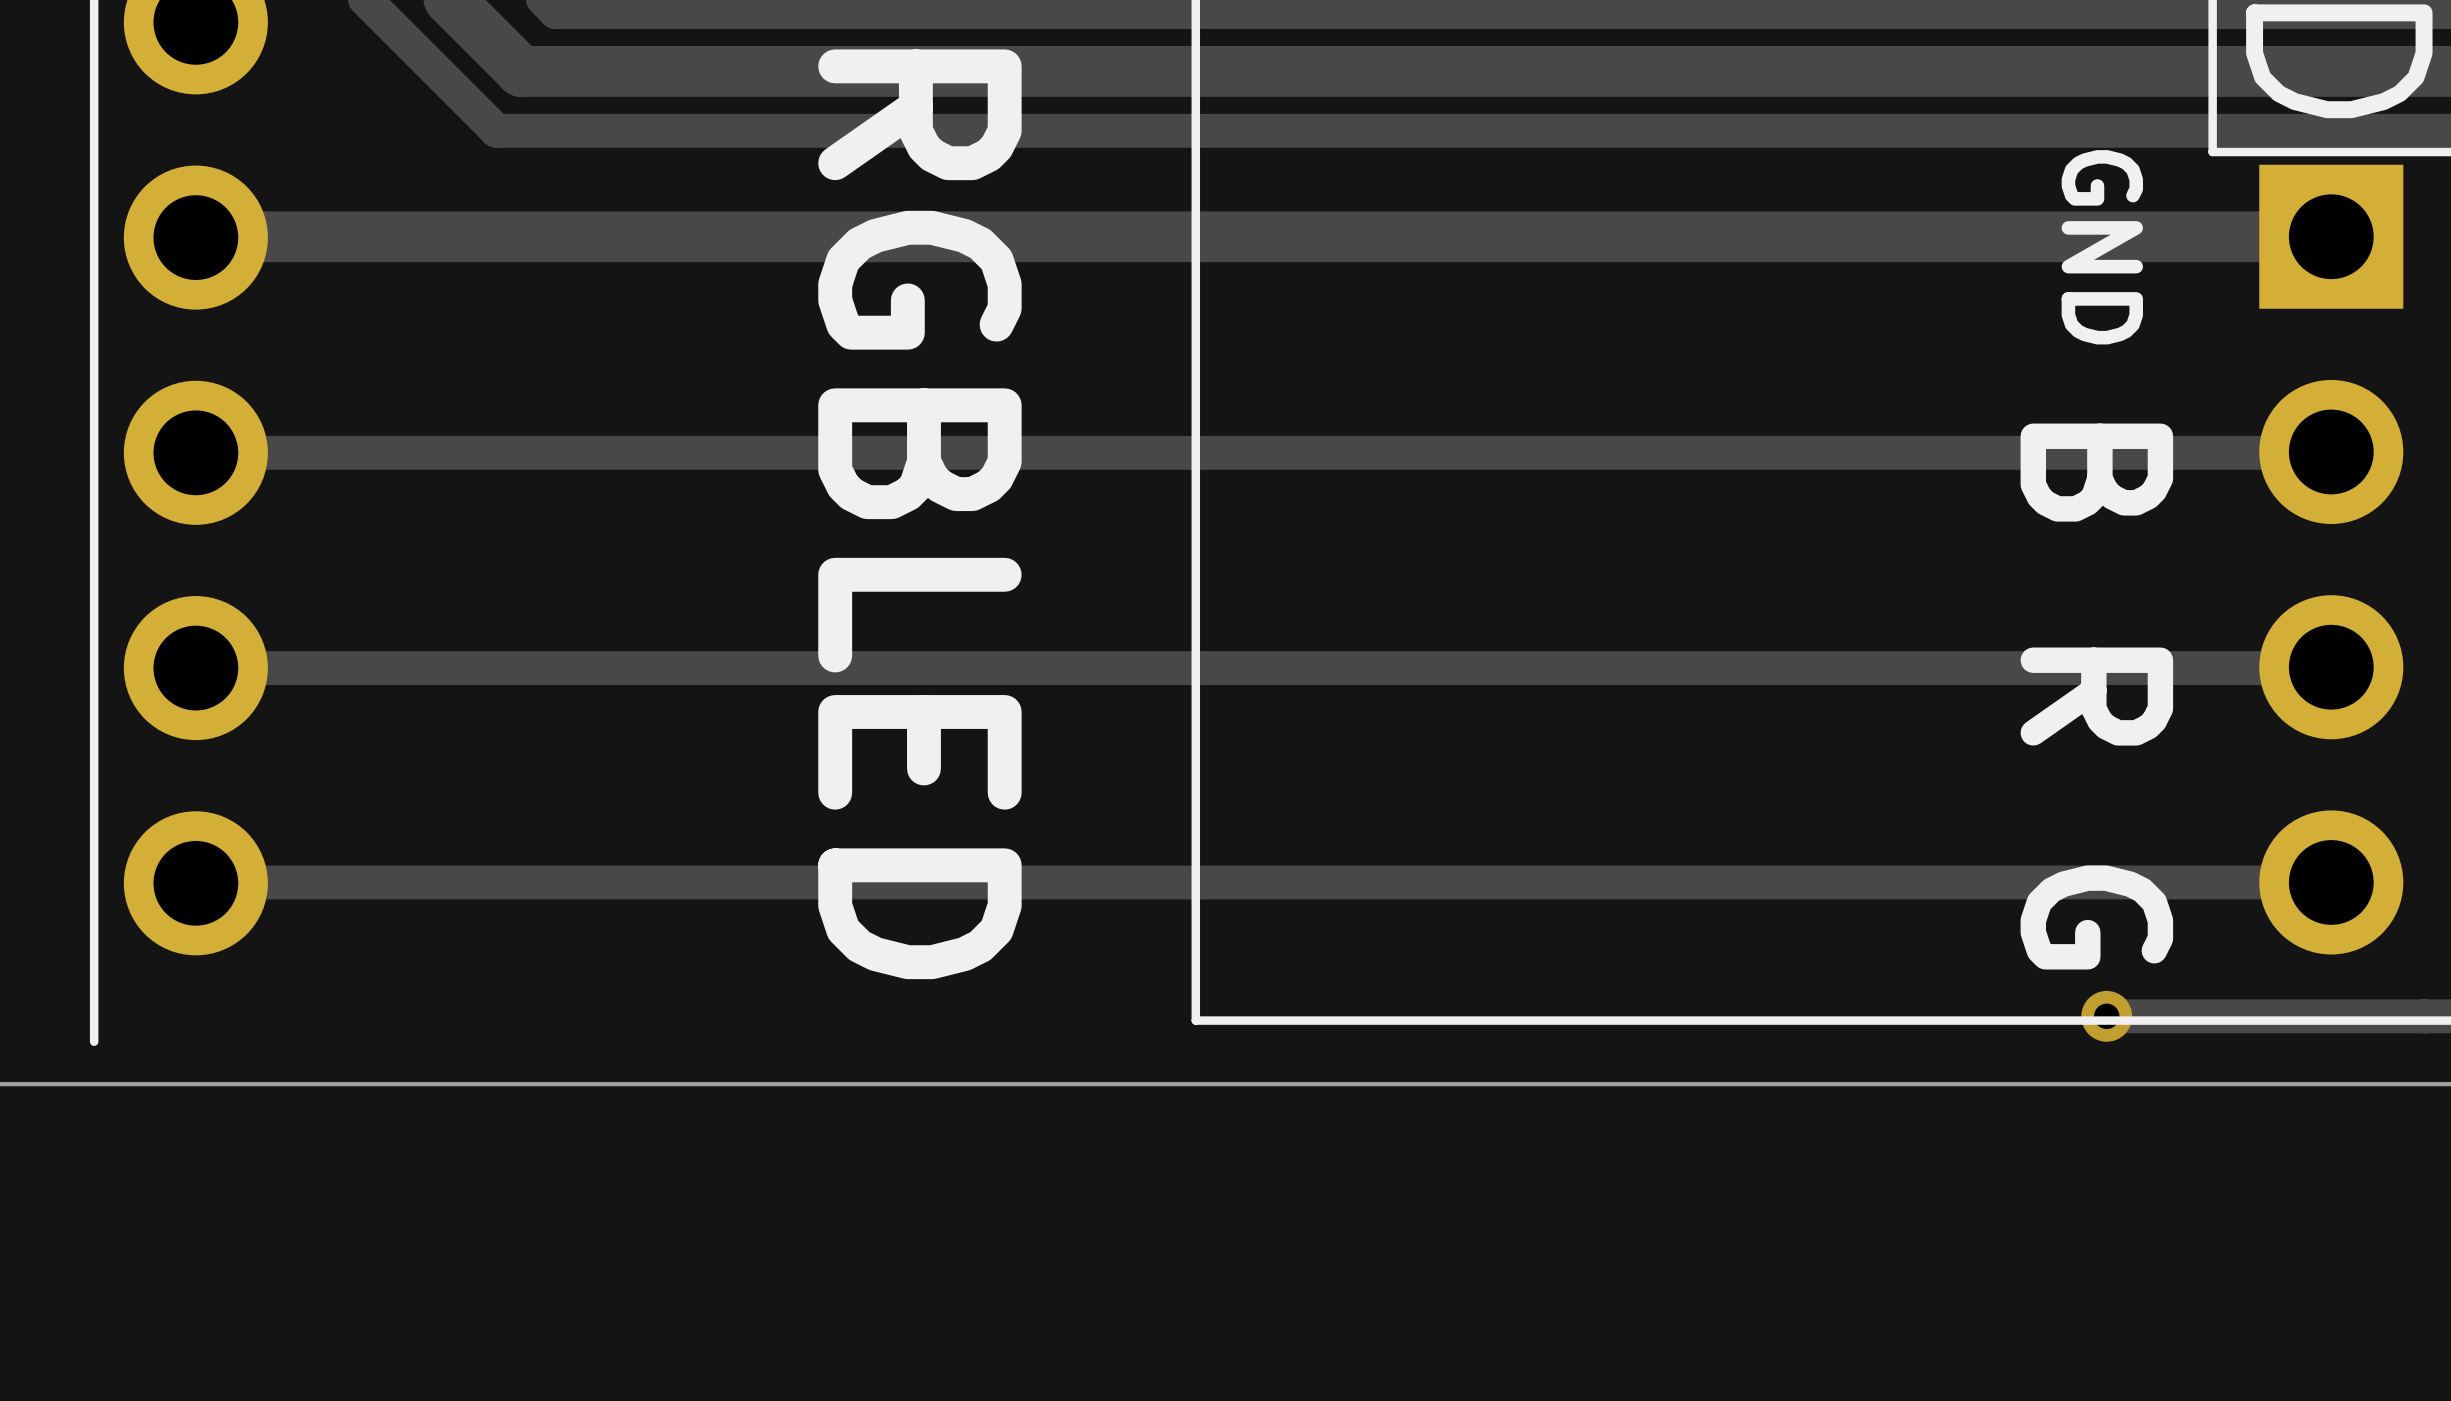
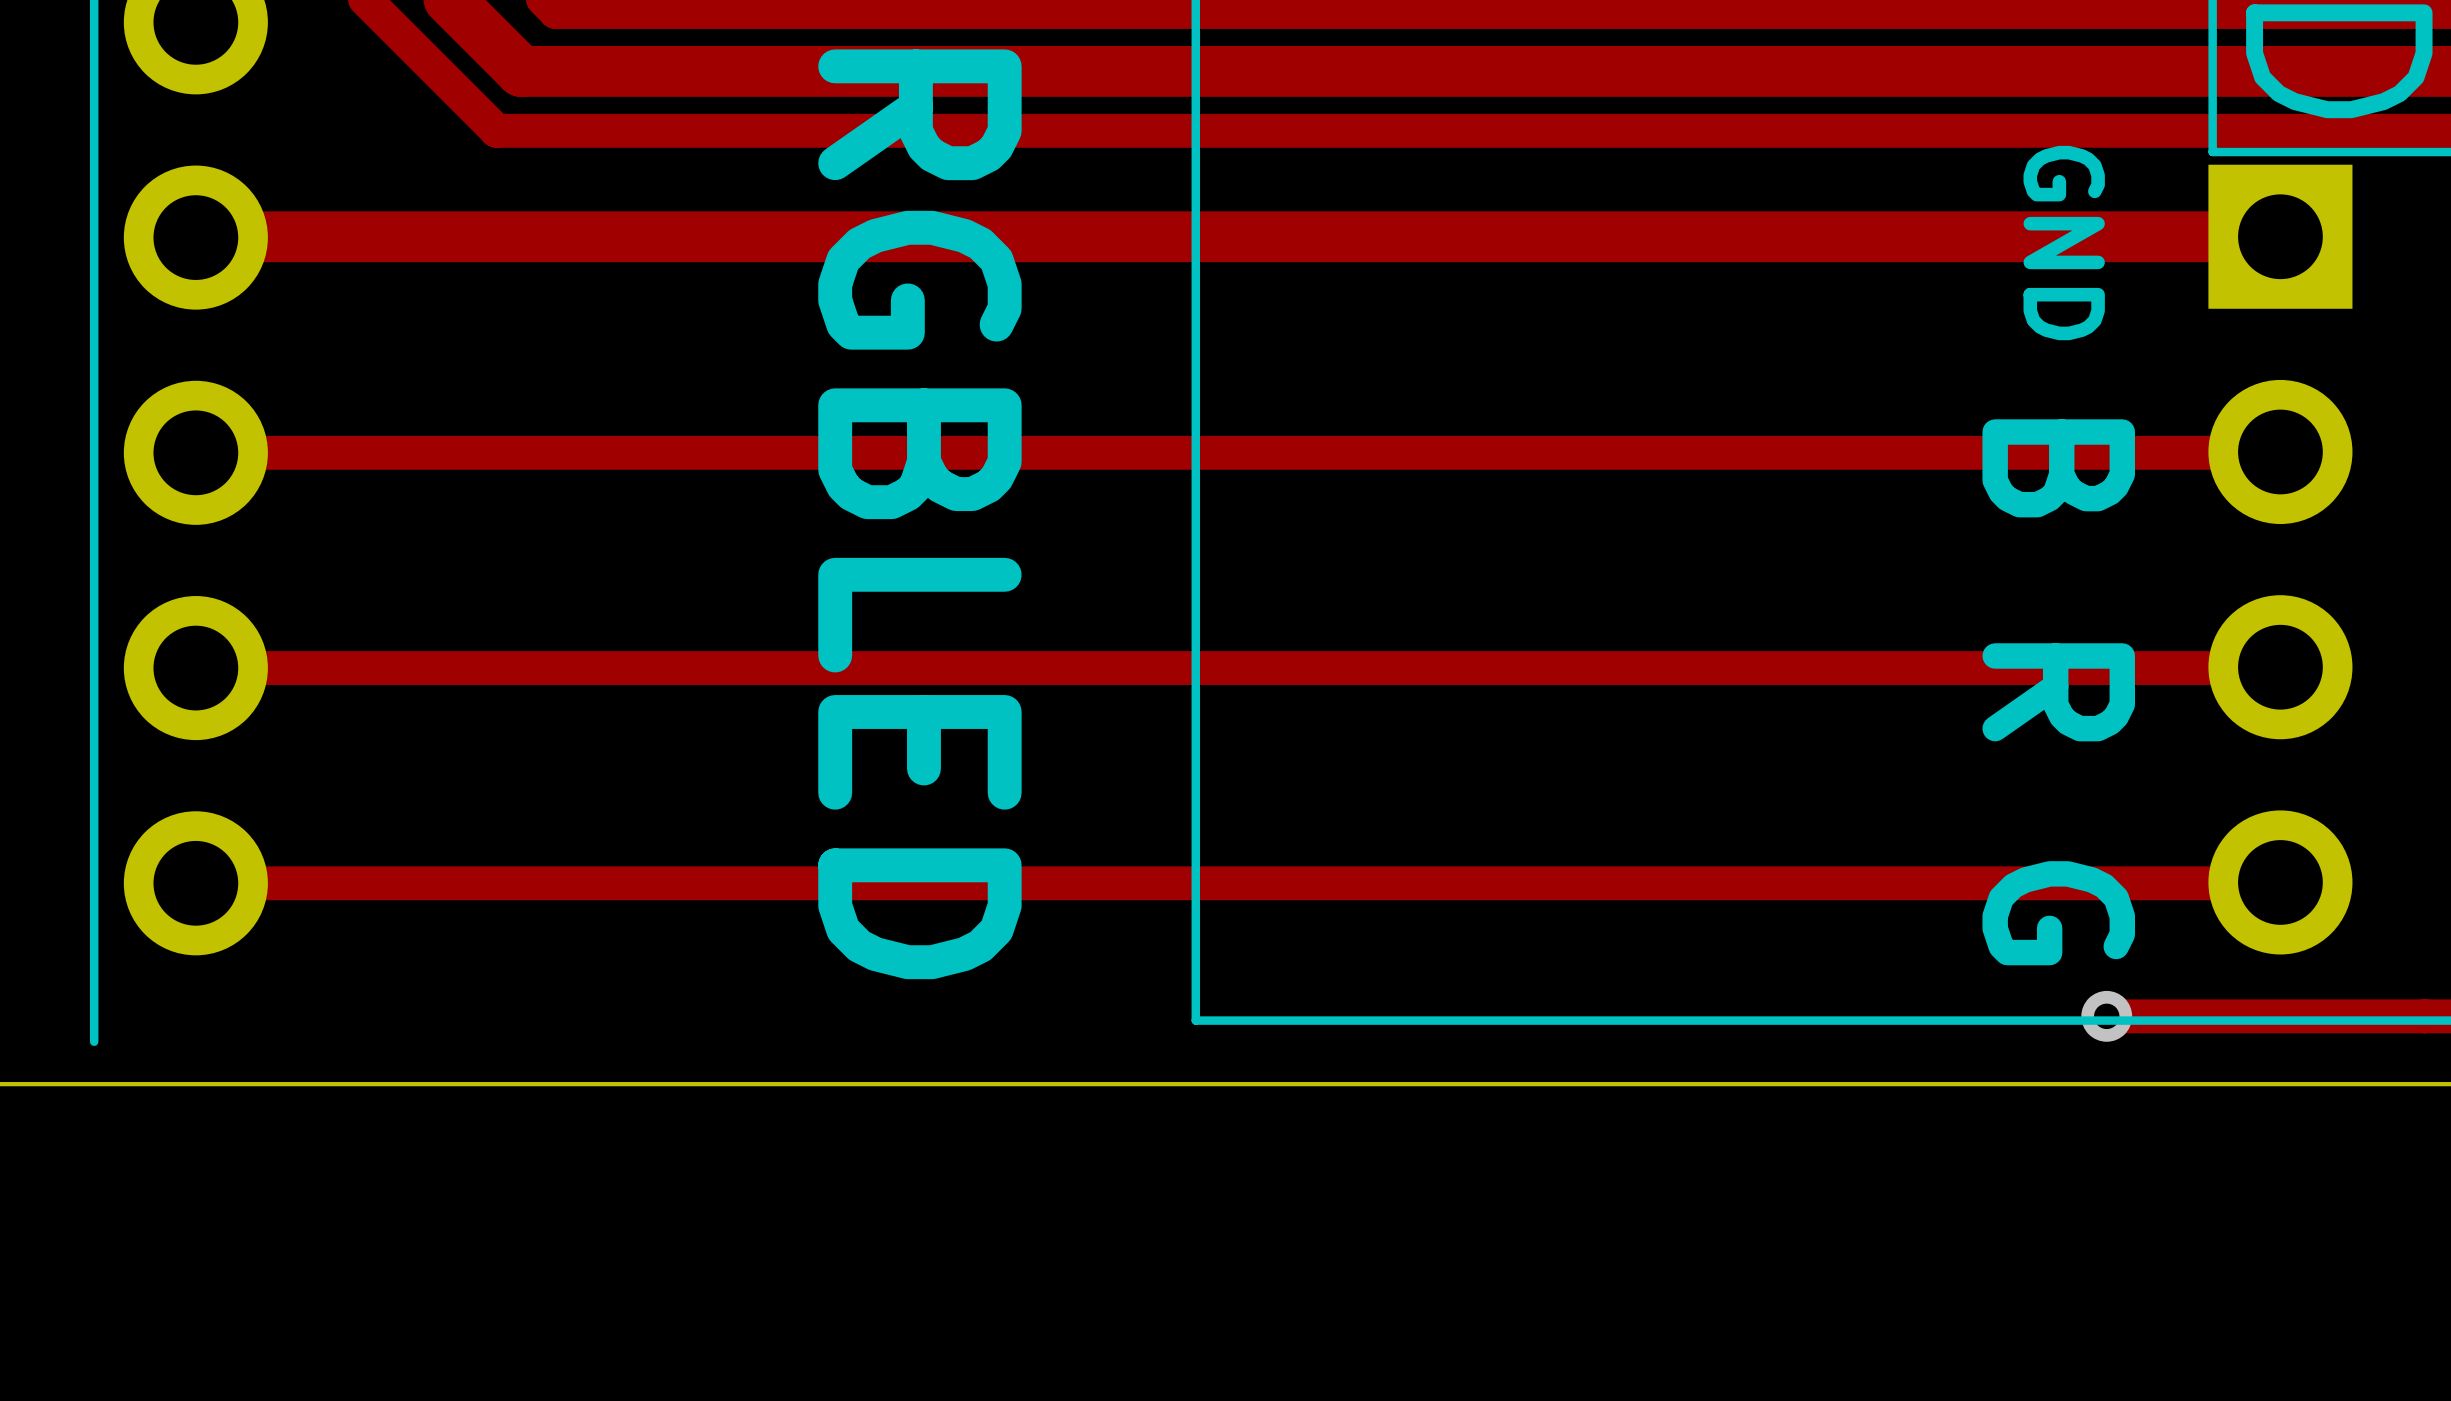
text position: GND (2102, 247) -> GND (2064, 243)
part position: (2331, 559) -> (2280, 559)
text position: B R G (2096, 696) -> B R G (2058, 692)
track: (196, 882) (2331, 882) -> (195, 883) (2280, 883)

